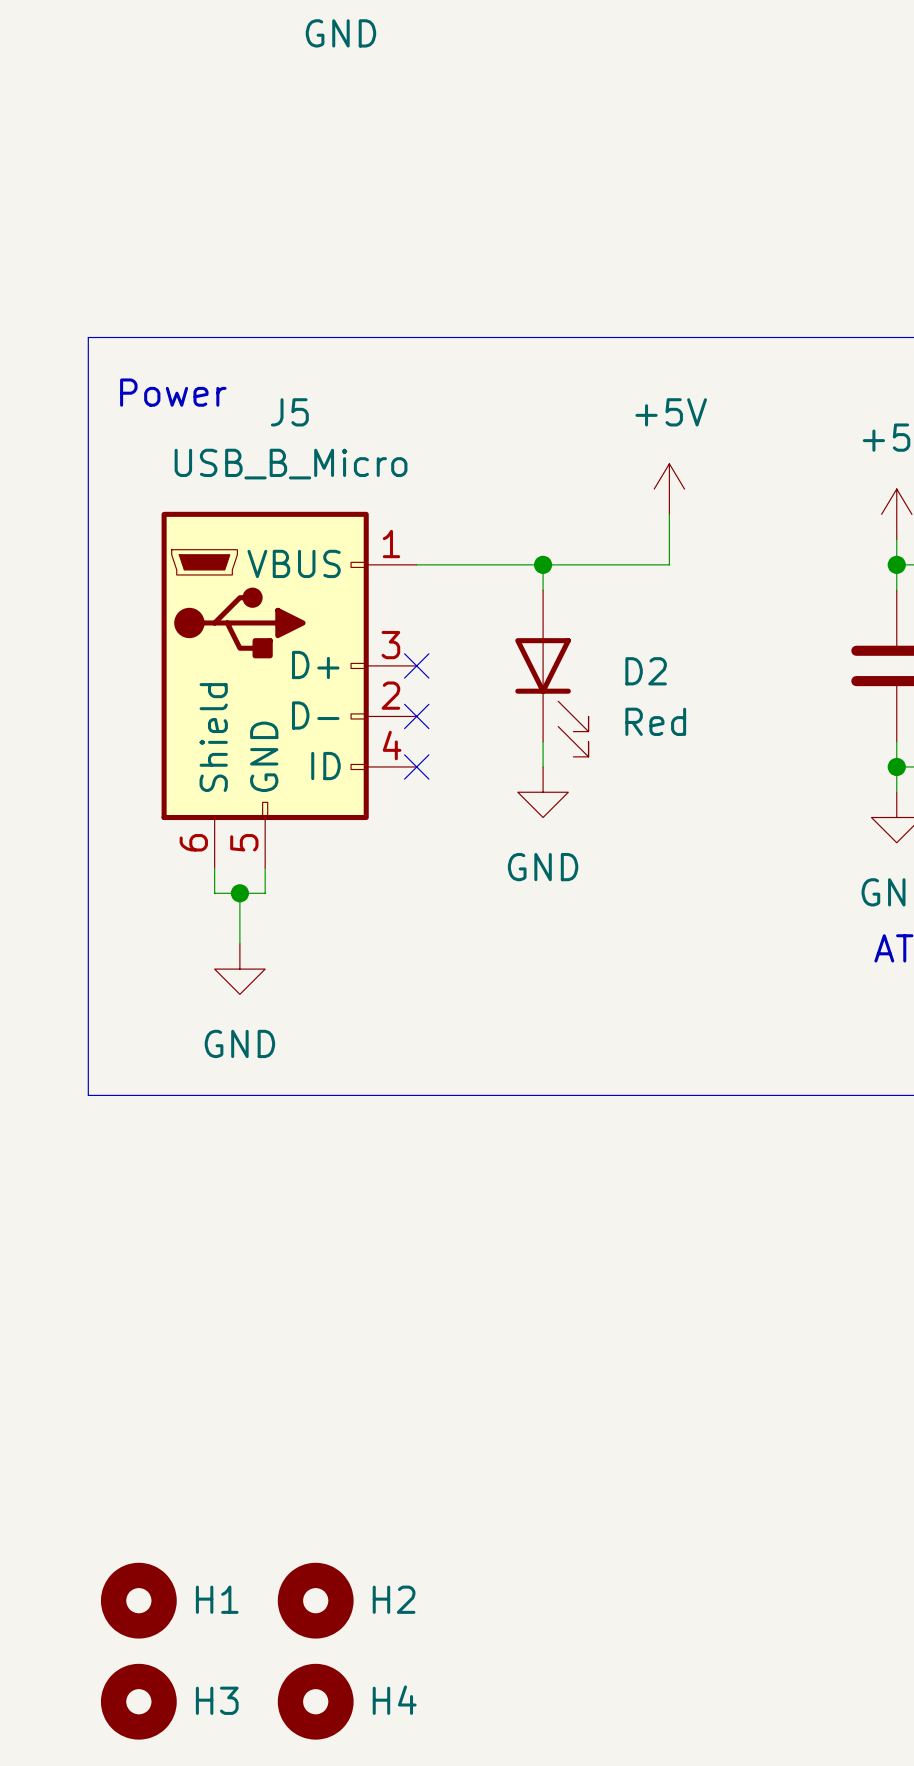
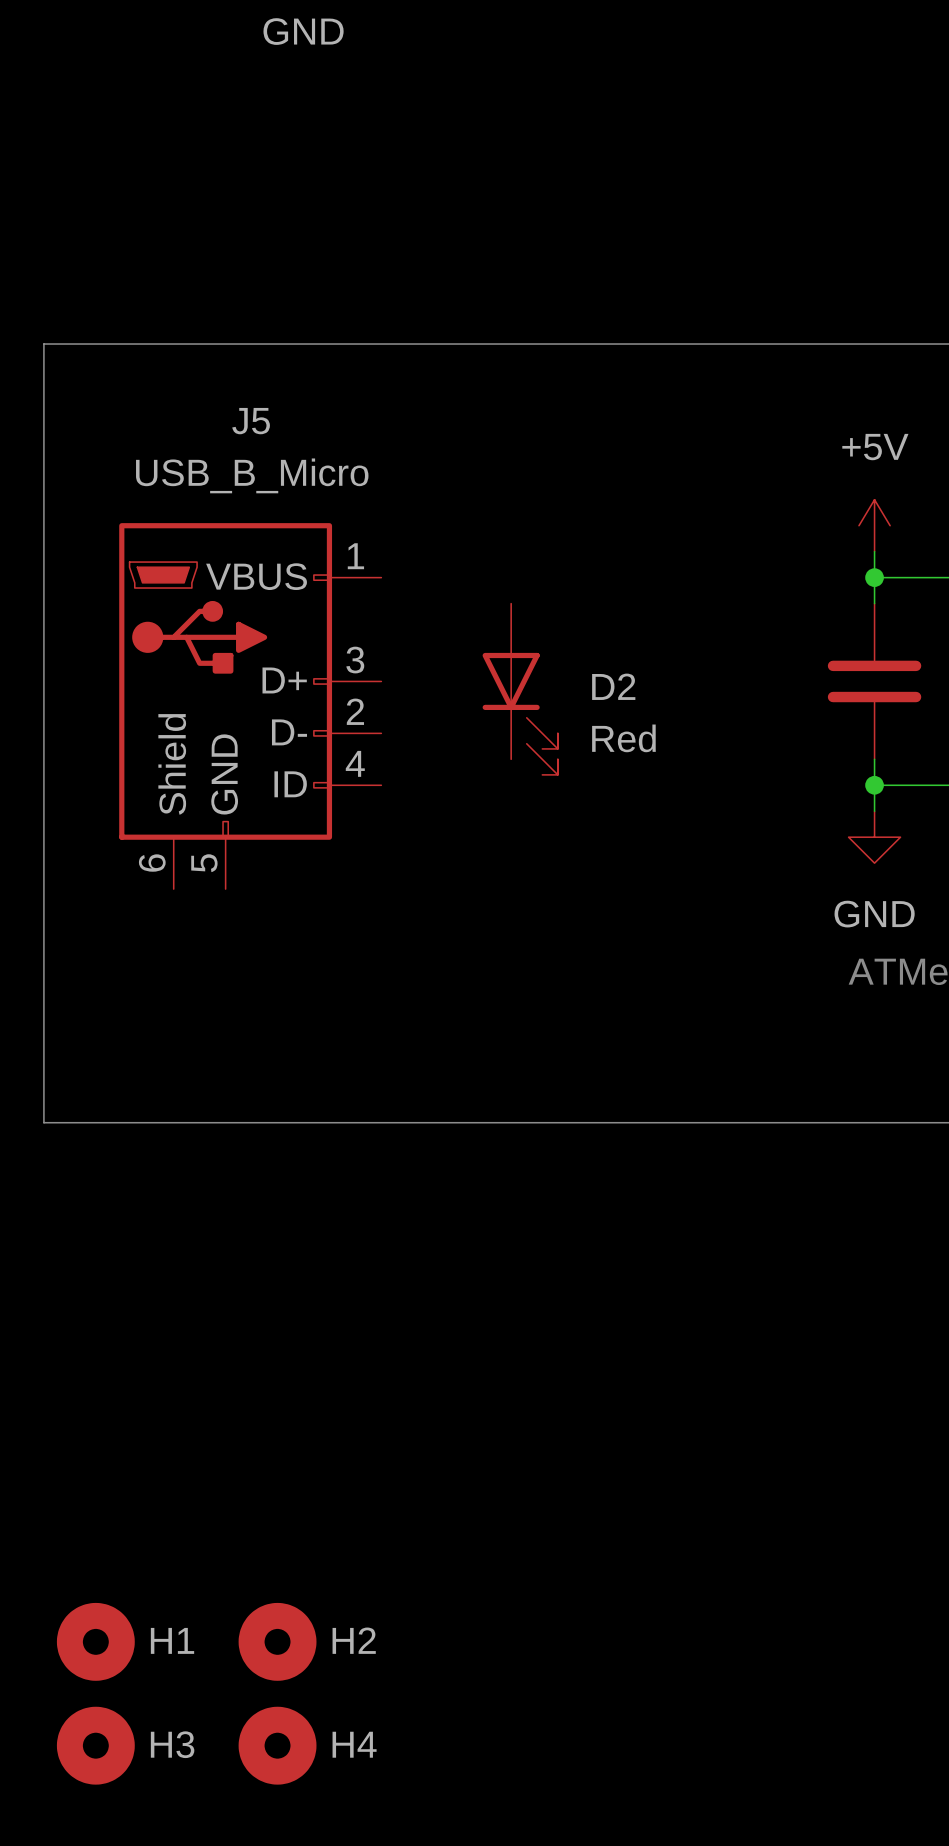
text: Power (173, 392) -> none
power symbol: +5V (669, 489) -> none
wire: (669, 514) (669, 564) (416, 564) -> none
wire: (543, 564) (543, 590) -> none
junction: (543, 564) -> none
no-connect mark: (416, 665) -> none
no-connect mark: (416, 716) -> none
wire: (543, 741) (543, 766) -> none
no-connect mark: (416, 766) -> none
power symbol: GND (543, 792) -> none
wire: (214, 868) (214, 893) (265, 893) (265, 868) -> none
wire: (239, 893) (239, 943) -> none
junction: (239, 893) -> none
power symbol: GND (239, 969) -> none

